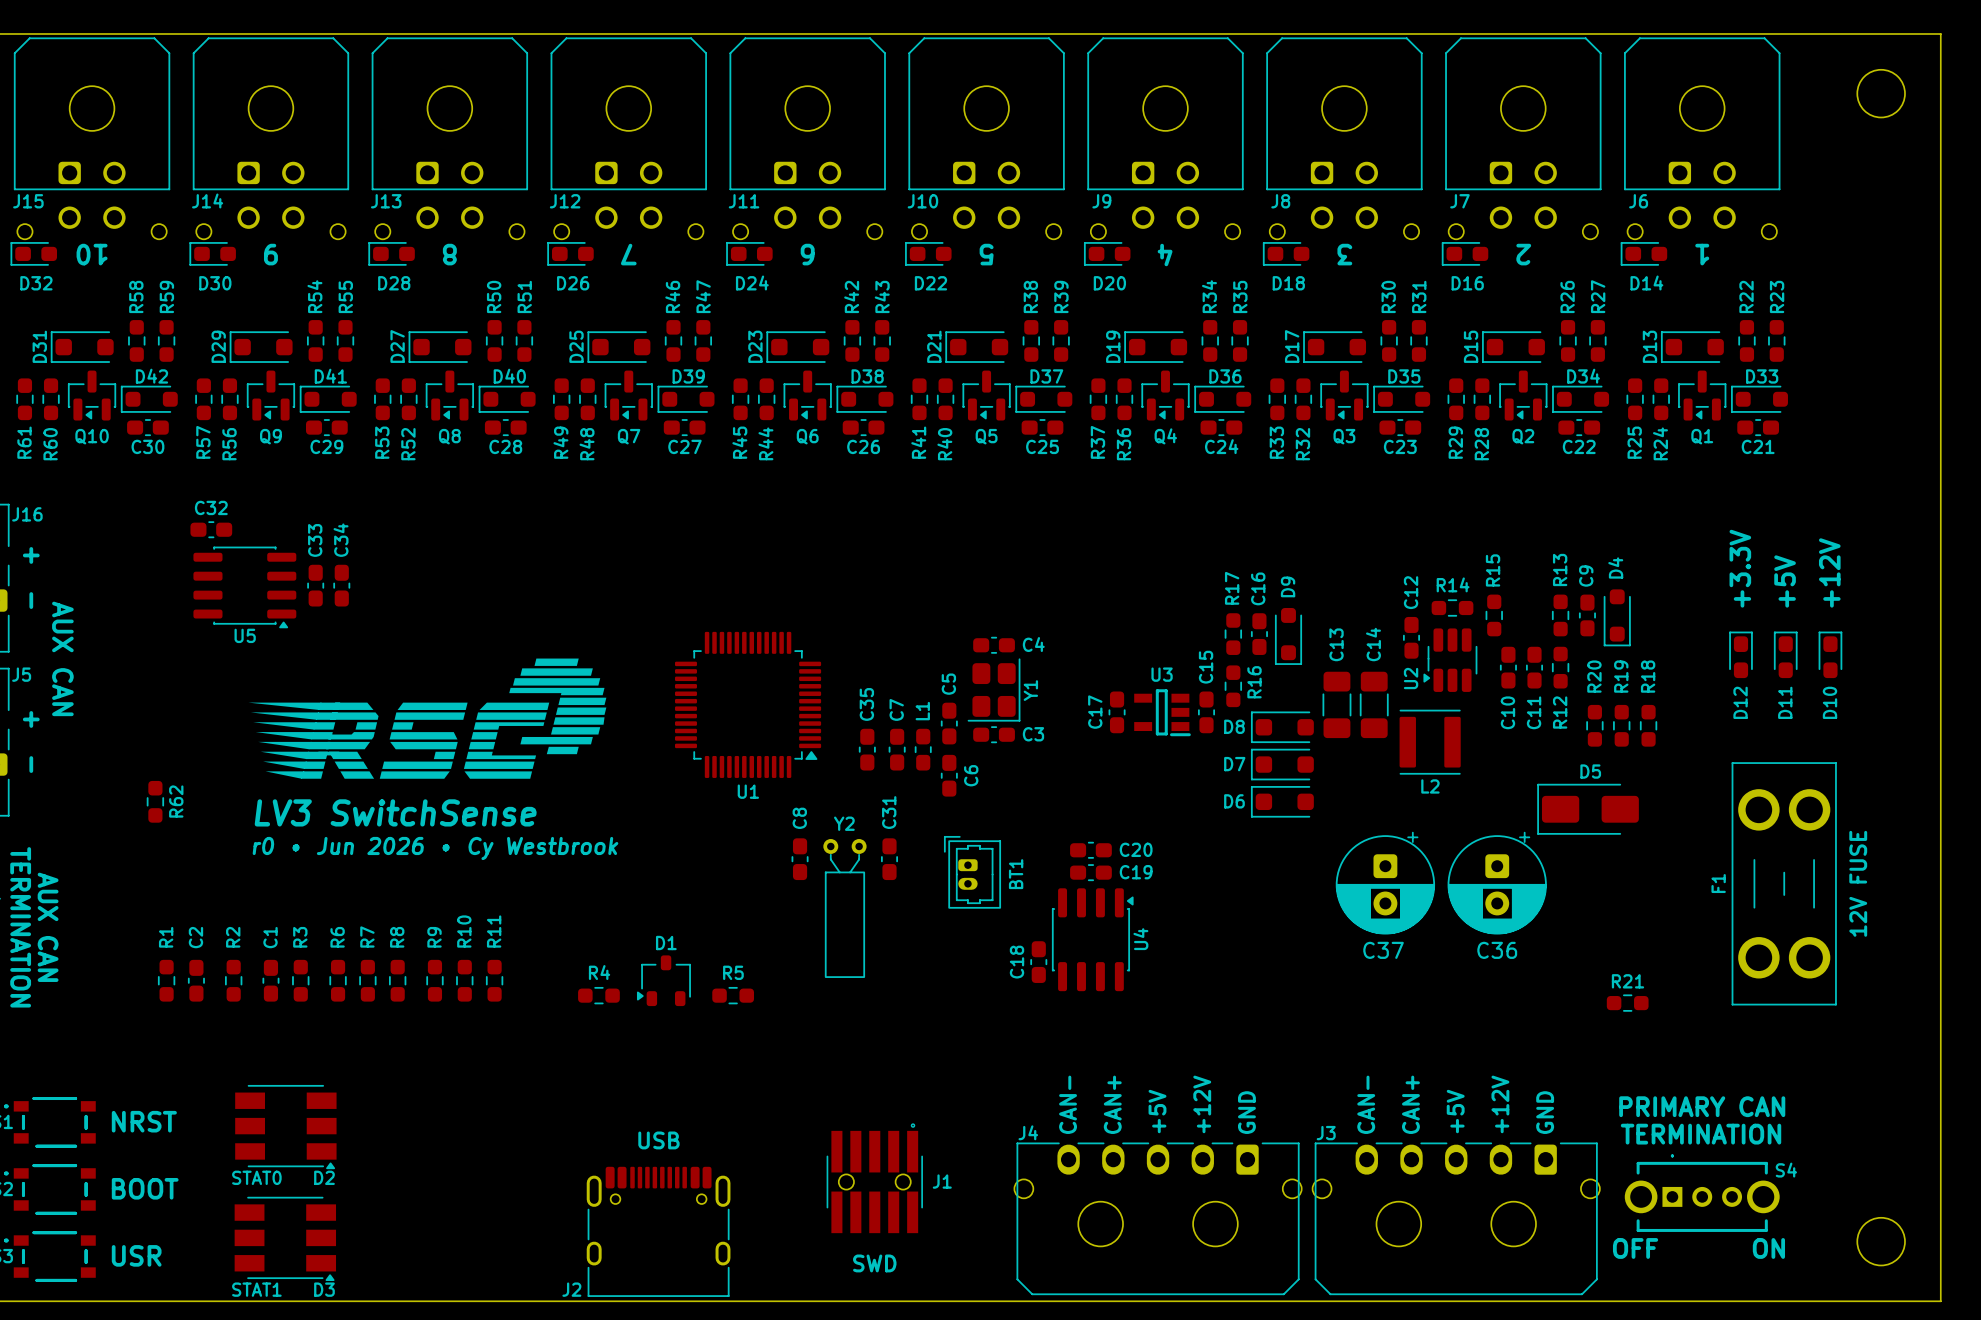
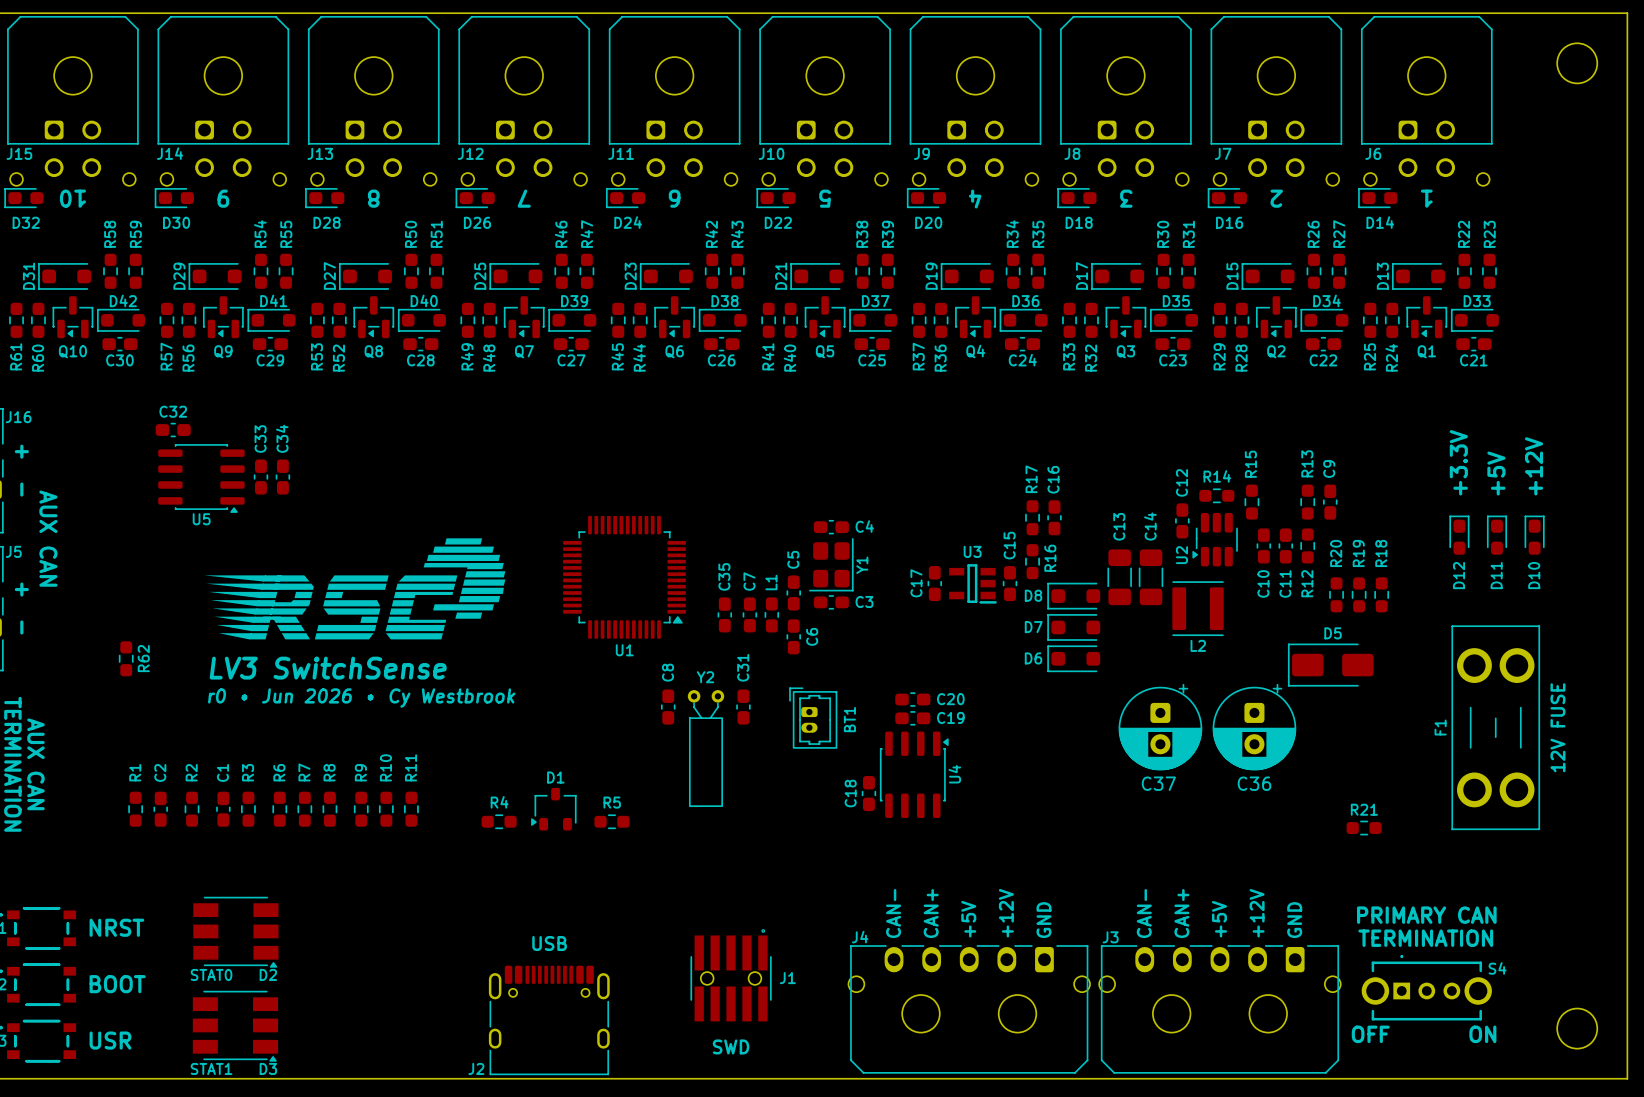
D4: (1617, 617) -> none
D9: (1288, 636) -> none

